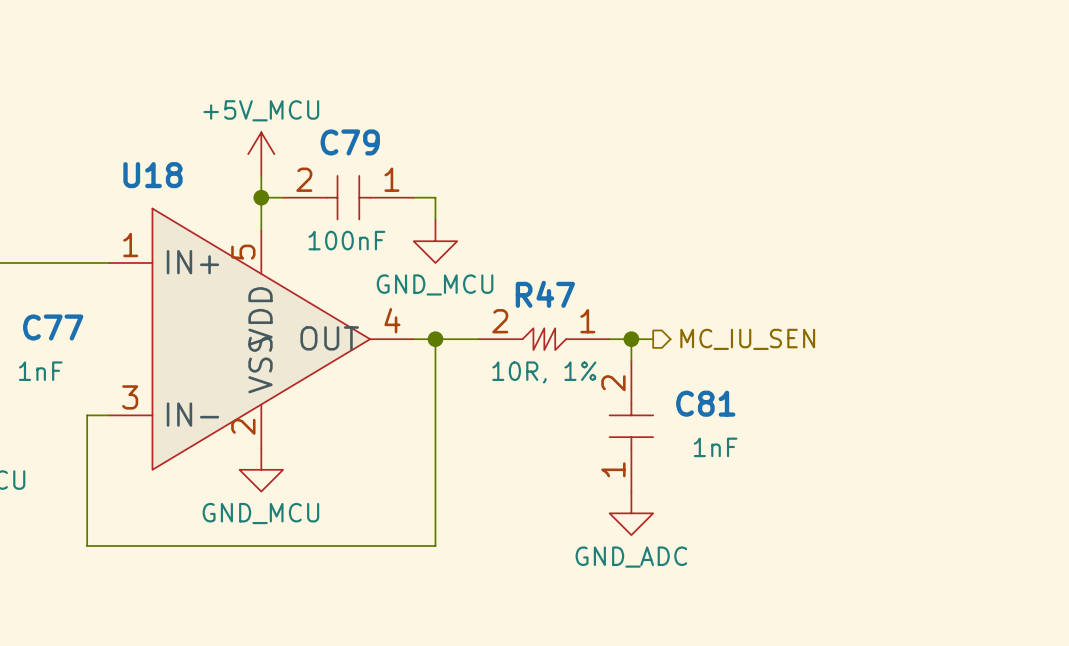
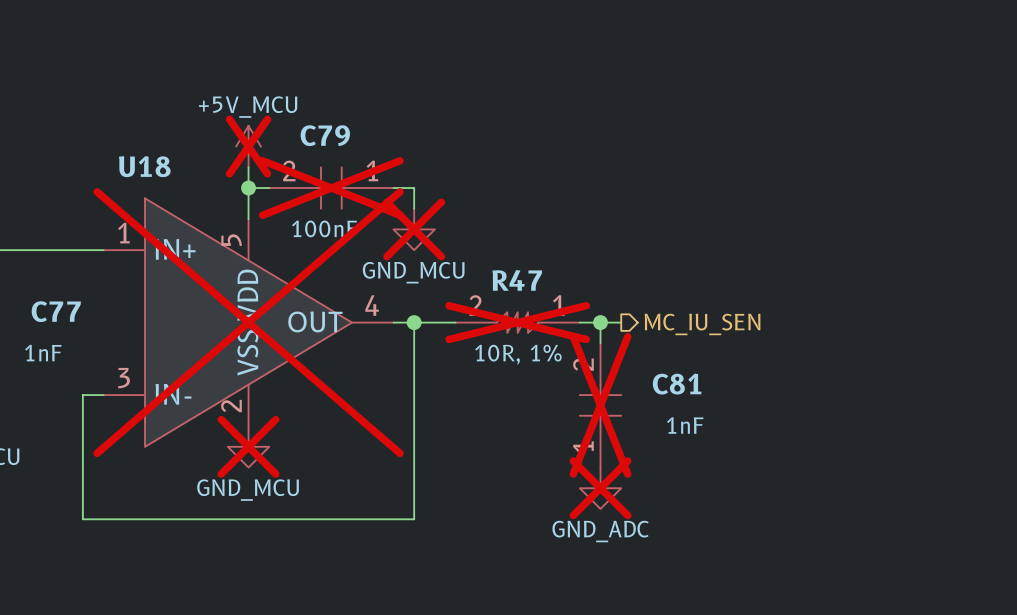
power symbol do-not-place cross: none -> (248, 146)
C79 do-not-place cross: none -> (331, 188)
power symbol do-not-place cross: none -> (414, 229)
U18 do-not-place cross: none -> (248, 322)
R47 do-not-place cross: none -> (517, 322)
C81 do-not-place cross: none -> (600, 405)
power symbol do-not-place cross: none -> (248, 446)
power symbol do-not-place cross: none -> (600, 488)

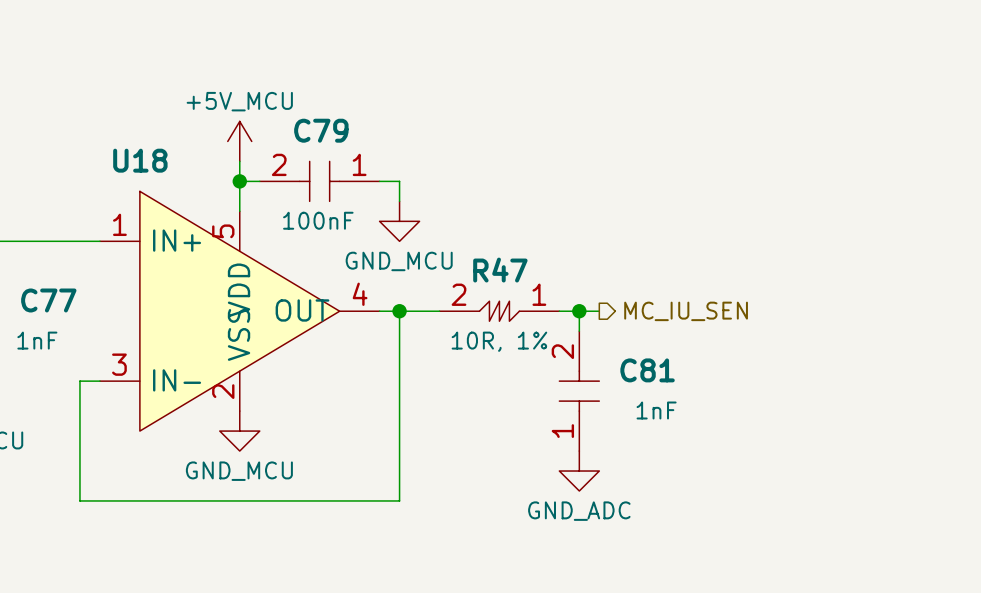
power symbol do-not-place cross: (248, 146) -> none
C79 do-not-place cross: (331, 188) -> none
power symbol do-not-place cross: (414, 229) -> none
U18 do-not-place cross: (248, 322) -> none
R47 do-not-place cross: (517, 322) -> none
C81 do-not-place cross: (600, 405) -> none
power symbol do-not-place cross: (248, 446) -> none
power symbol do-not-place cross: (600, 488) -> none

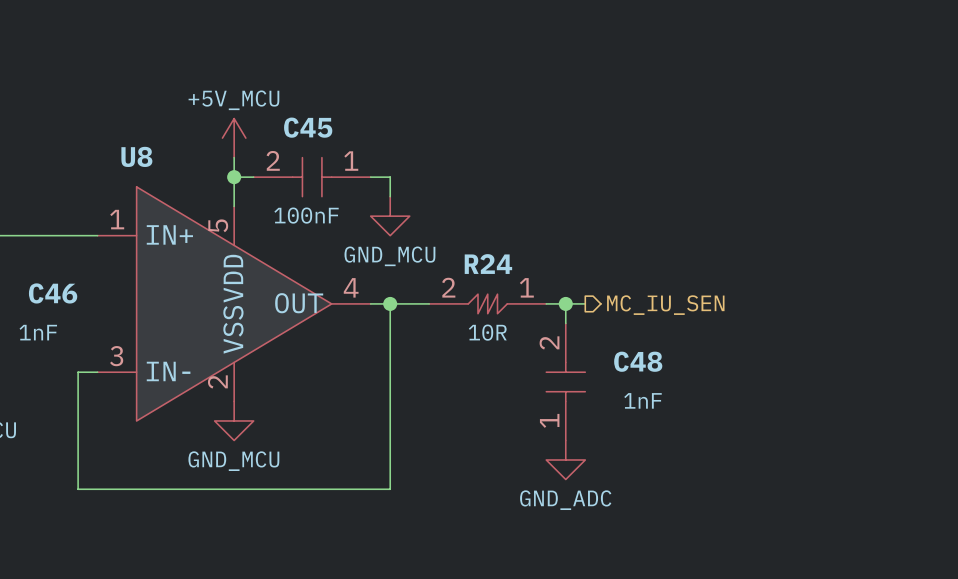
C79 name: C79 (321, 130) -> C45 (308, 127)
U18 name: U18 (140, 160) -> U8 (136, 156)
R47 name: R47 (500, 270) -> R24 (488, 264)
C77 name: C77 (48, 300) -> C46 (53, 293)
R47 value: 10R, 1% (499, 341) -> 10R (487, 332)
C81 name: C81 (647, 370) -> C48 (638, 361)

